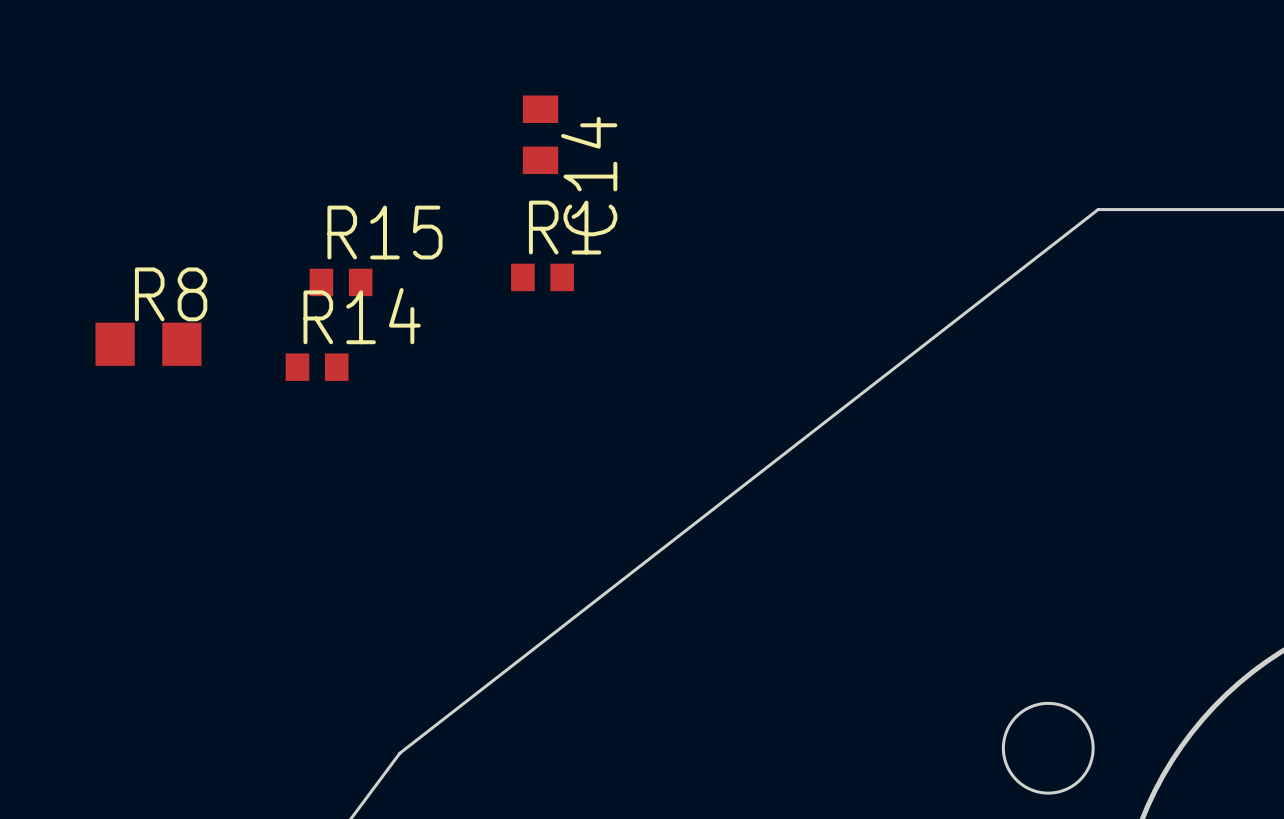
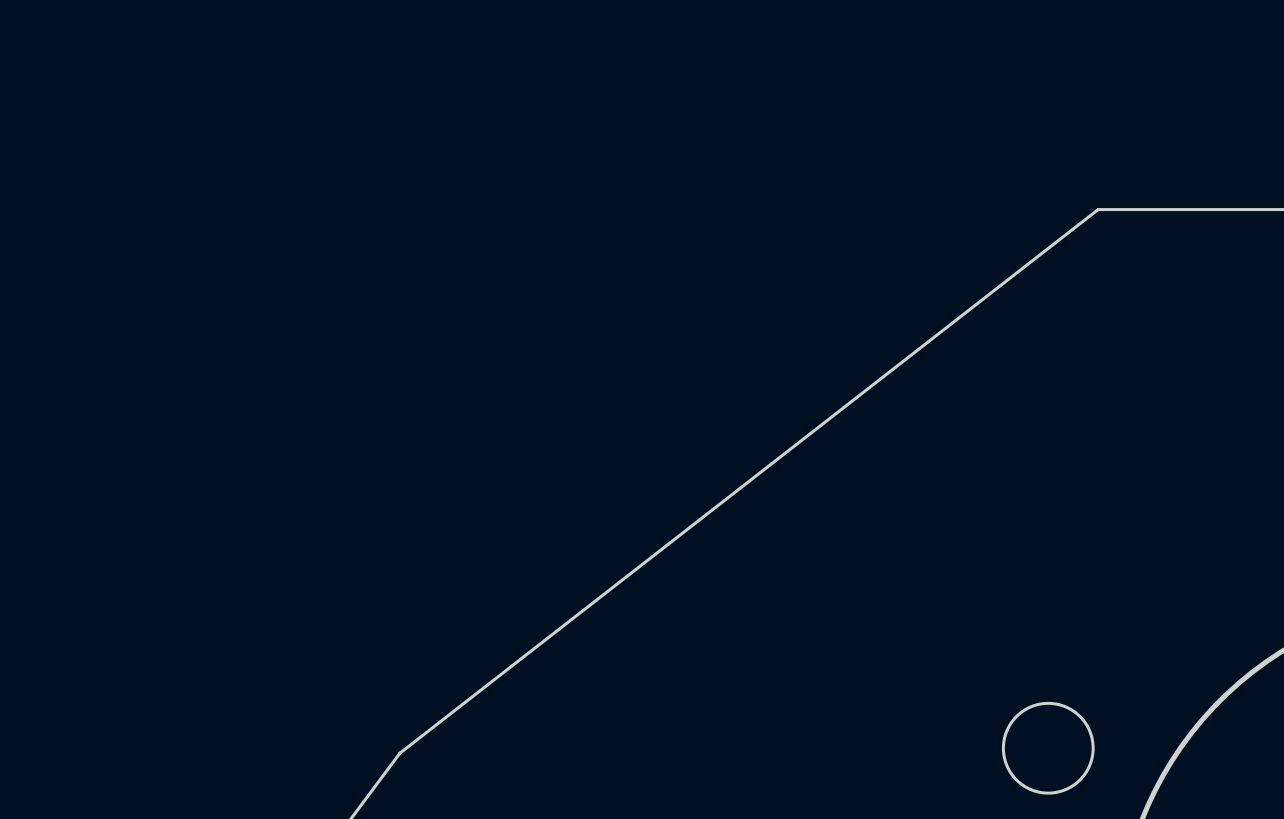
C14: (540, 134) -> none
R1: (542, 277) -> none
R15: (341, 282) -> none
R8: (148, 344) -> none
R14: (317, 367) -> none

